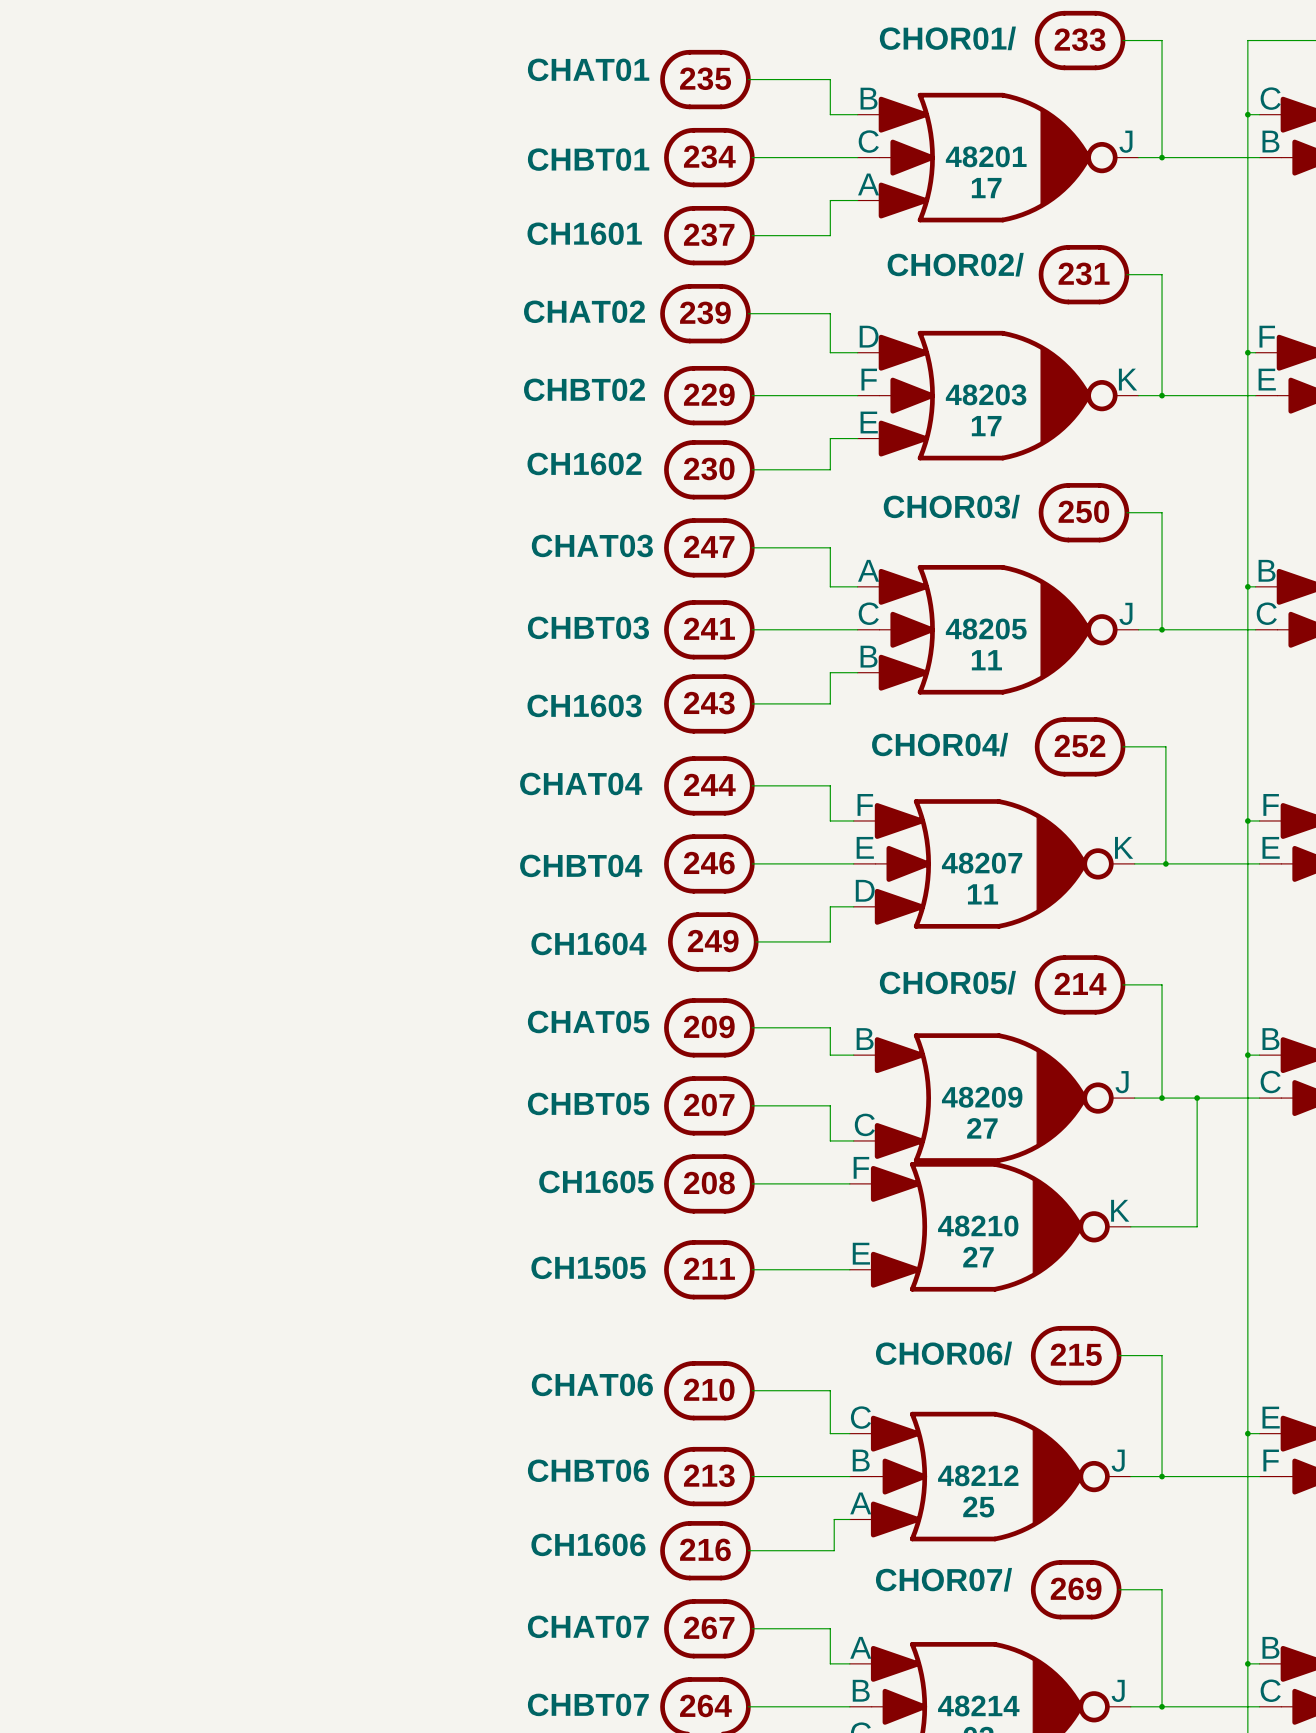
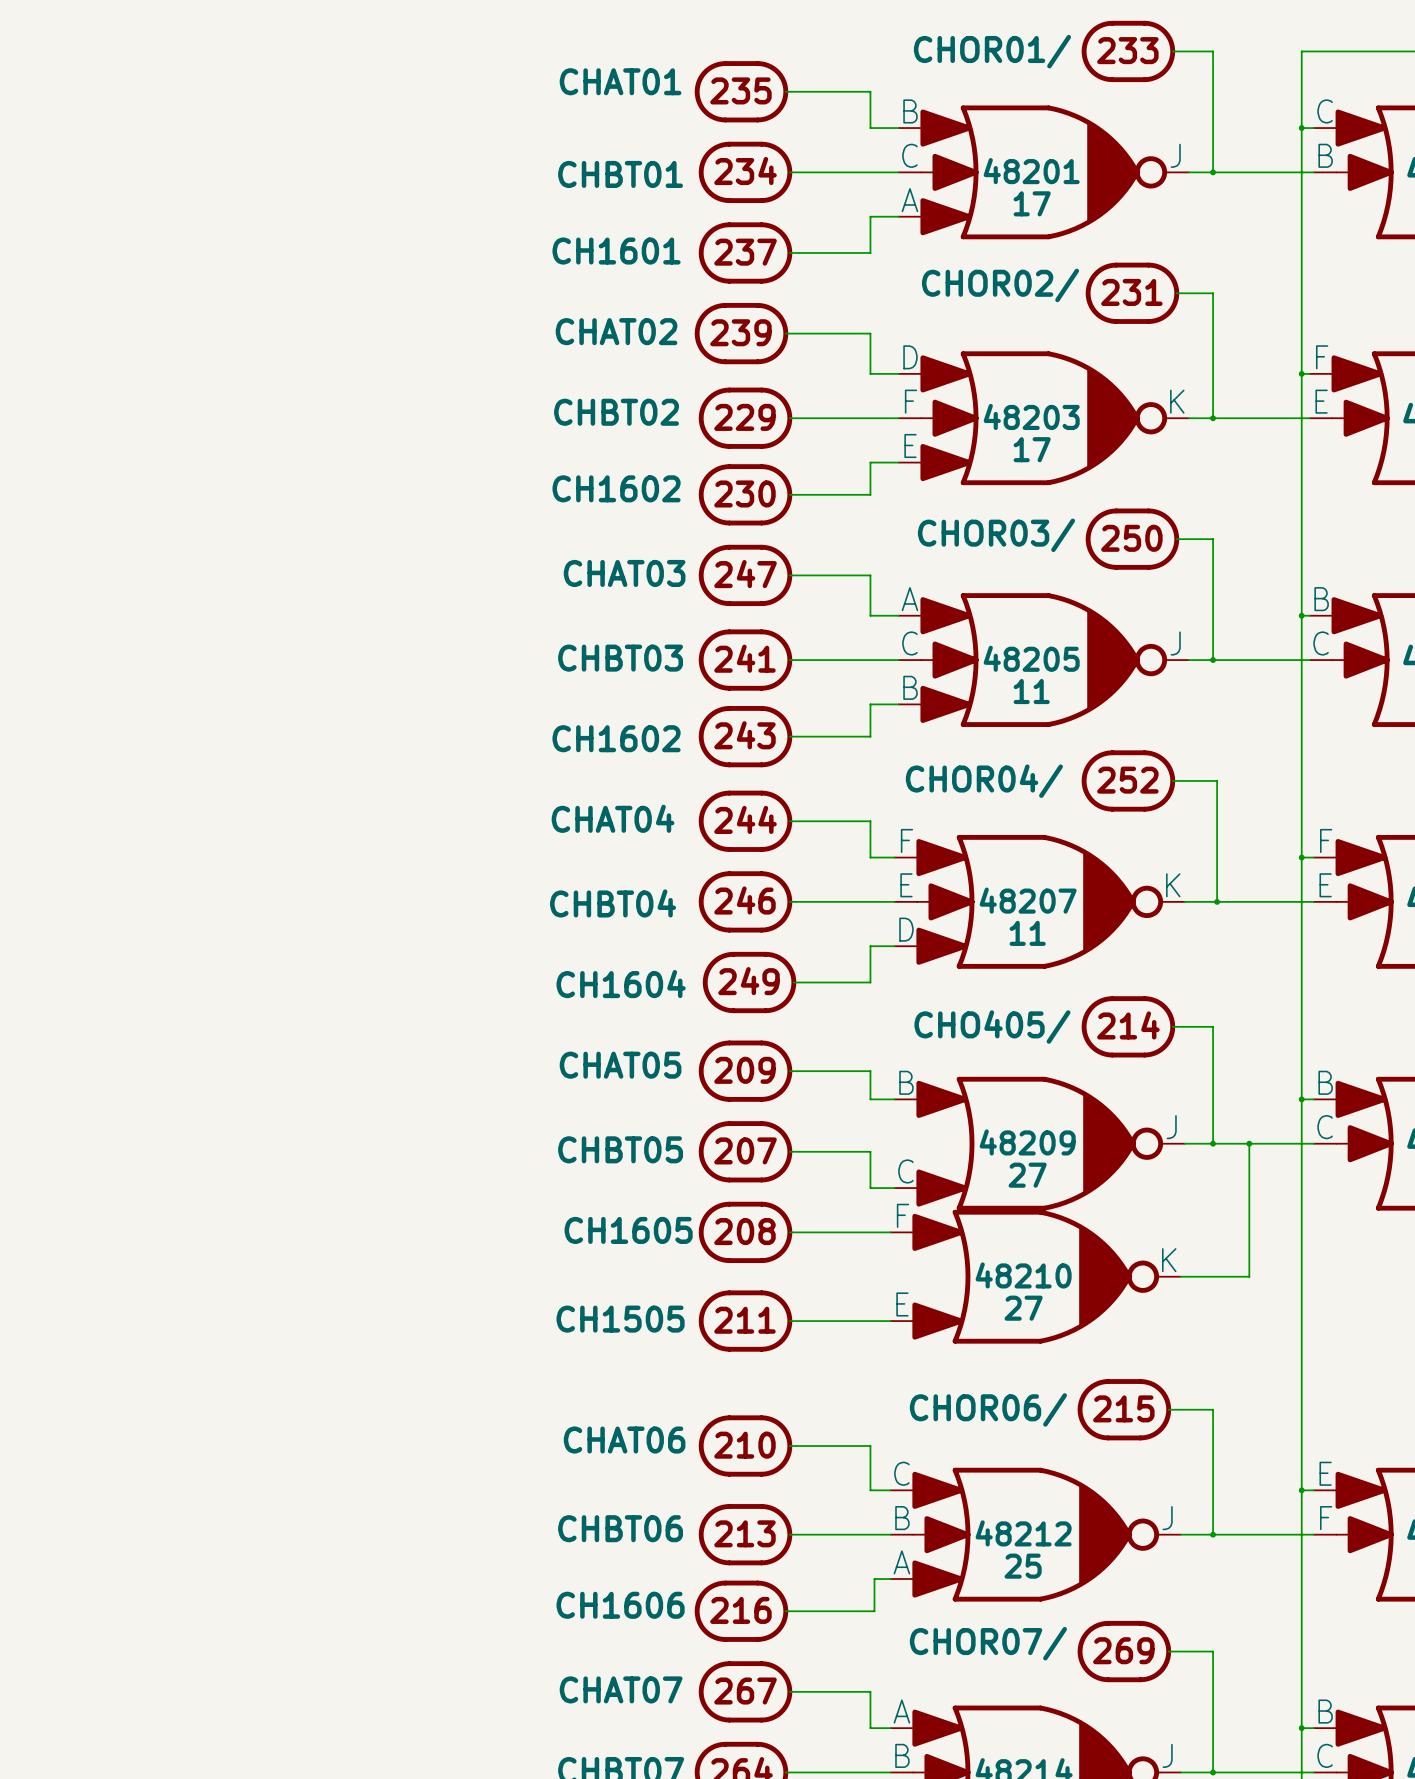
part text: CH1603 (584, 705) -> CH1602 (616, 738)
part text: CHOR05/ (947, 982) -> CHO405/ (992, 1027)

